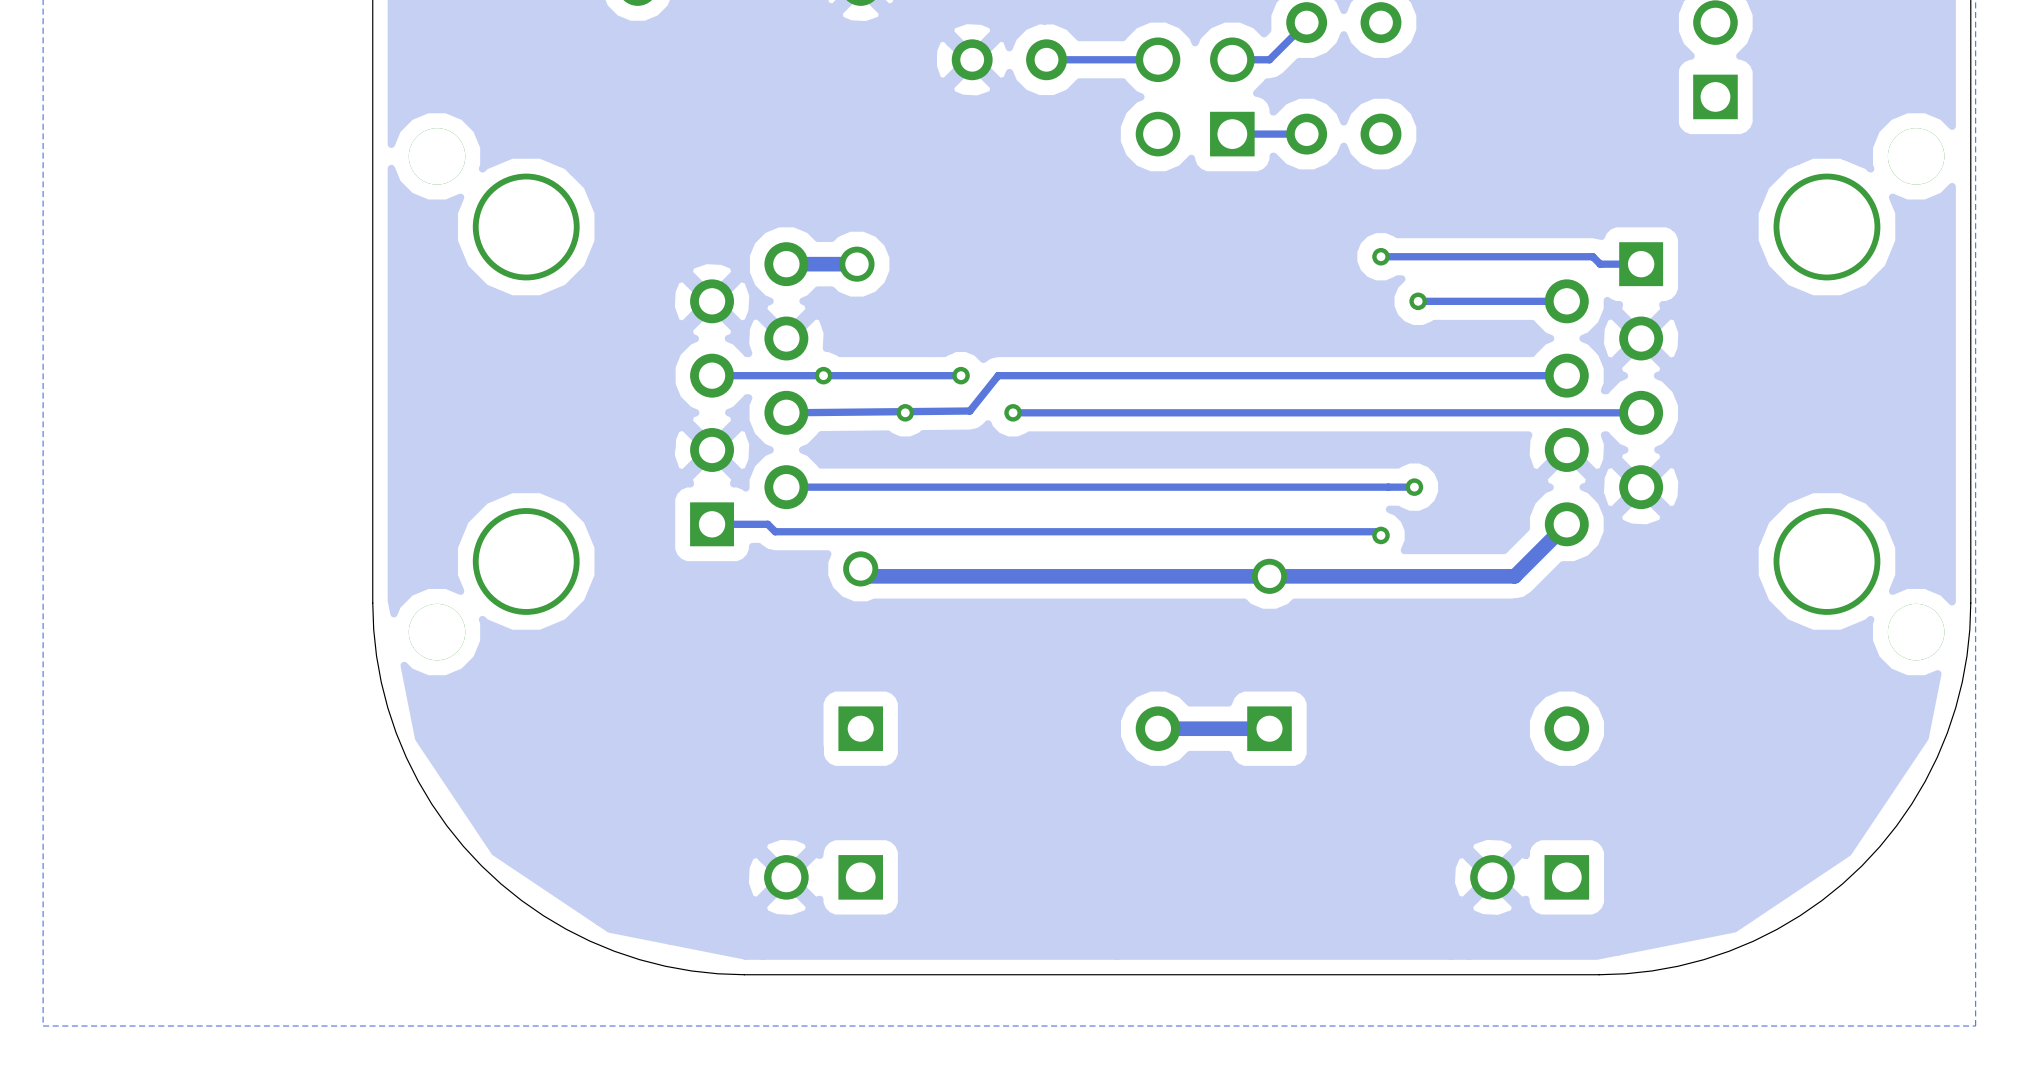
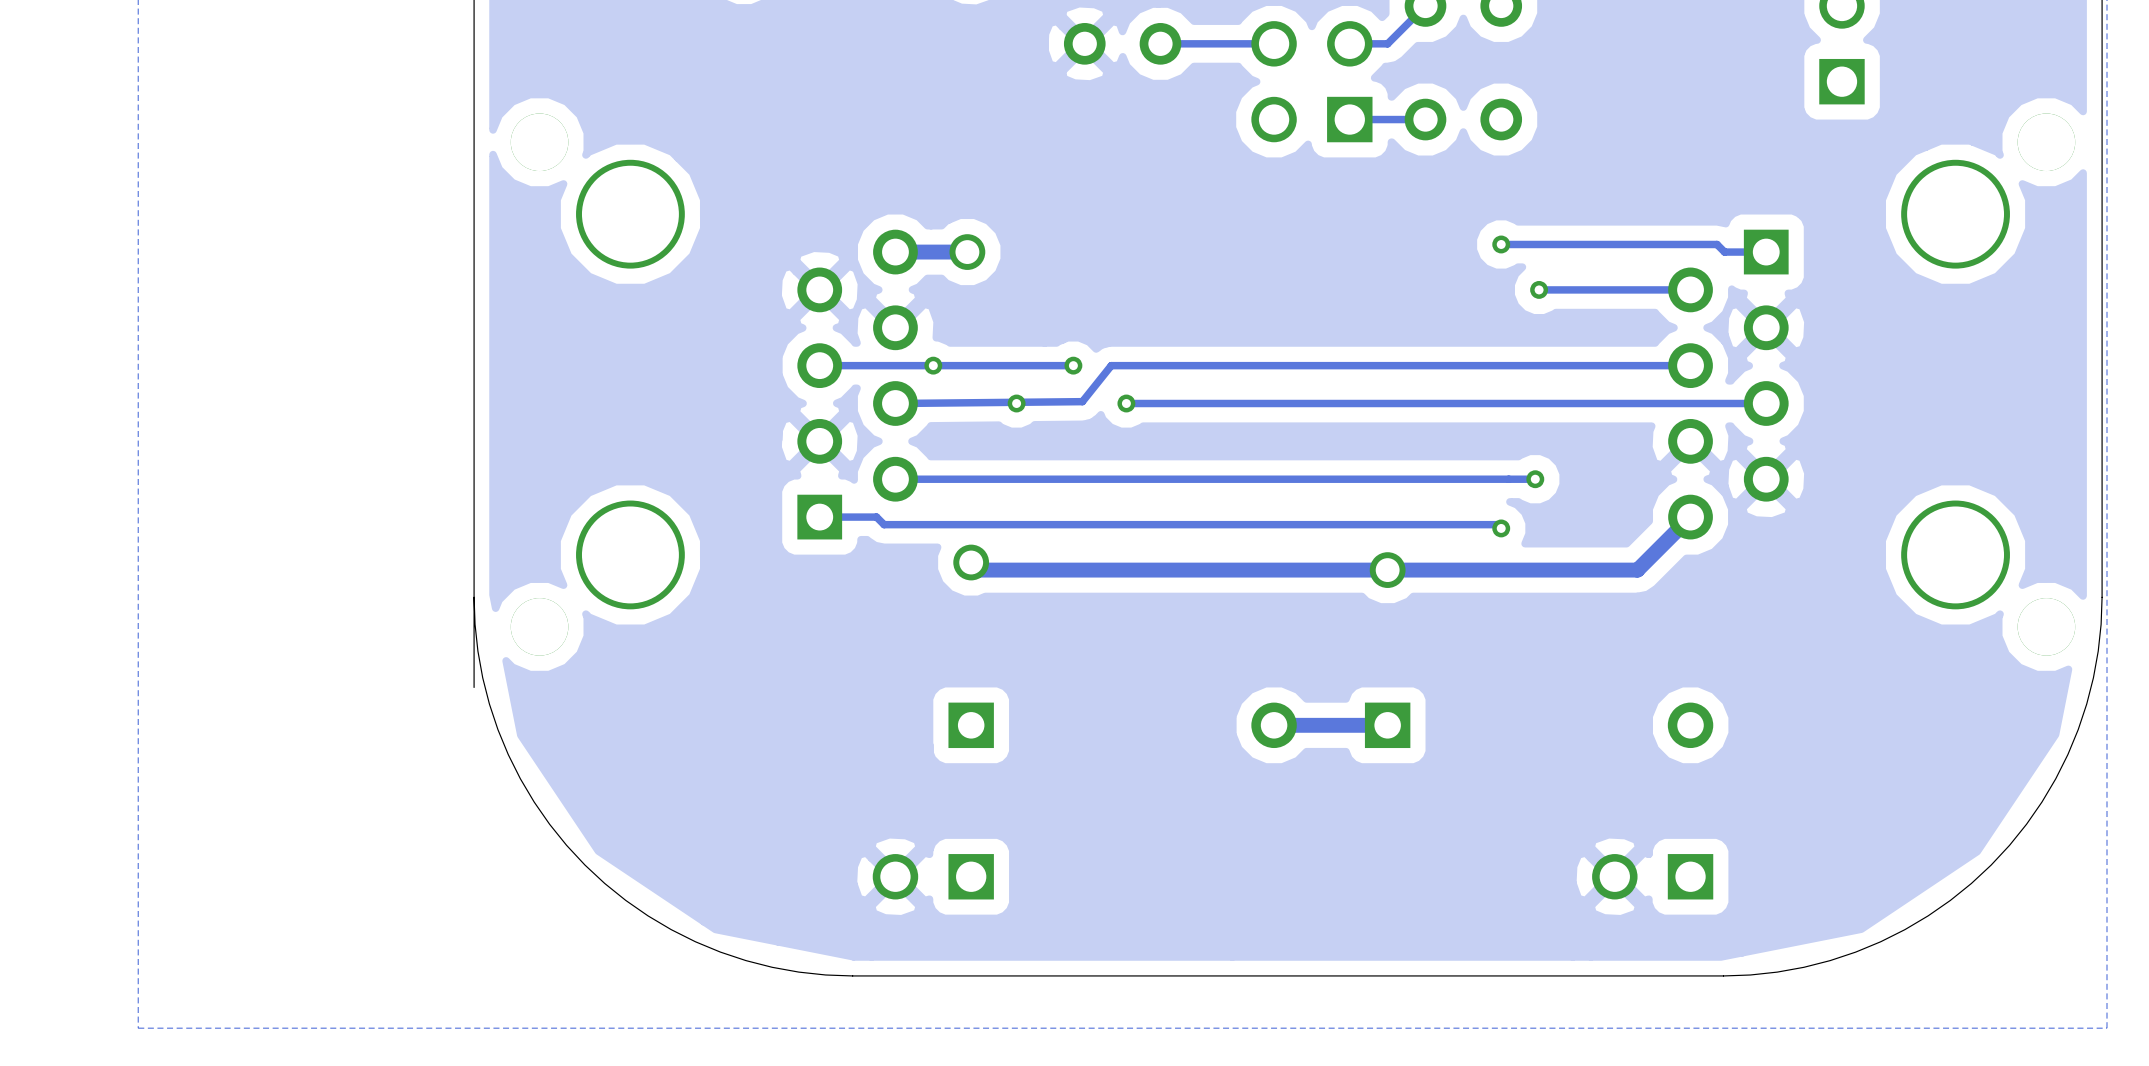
board edge: none -> (474, 597) (474, 687)

